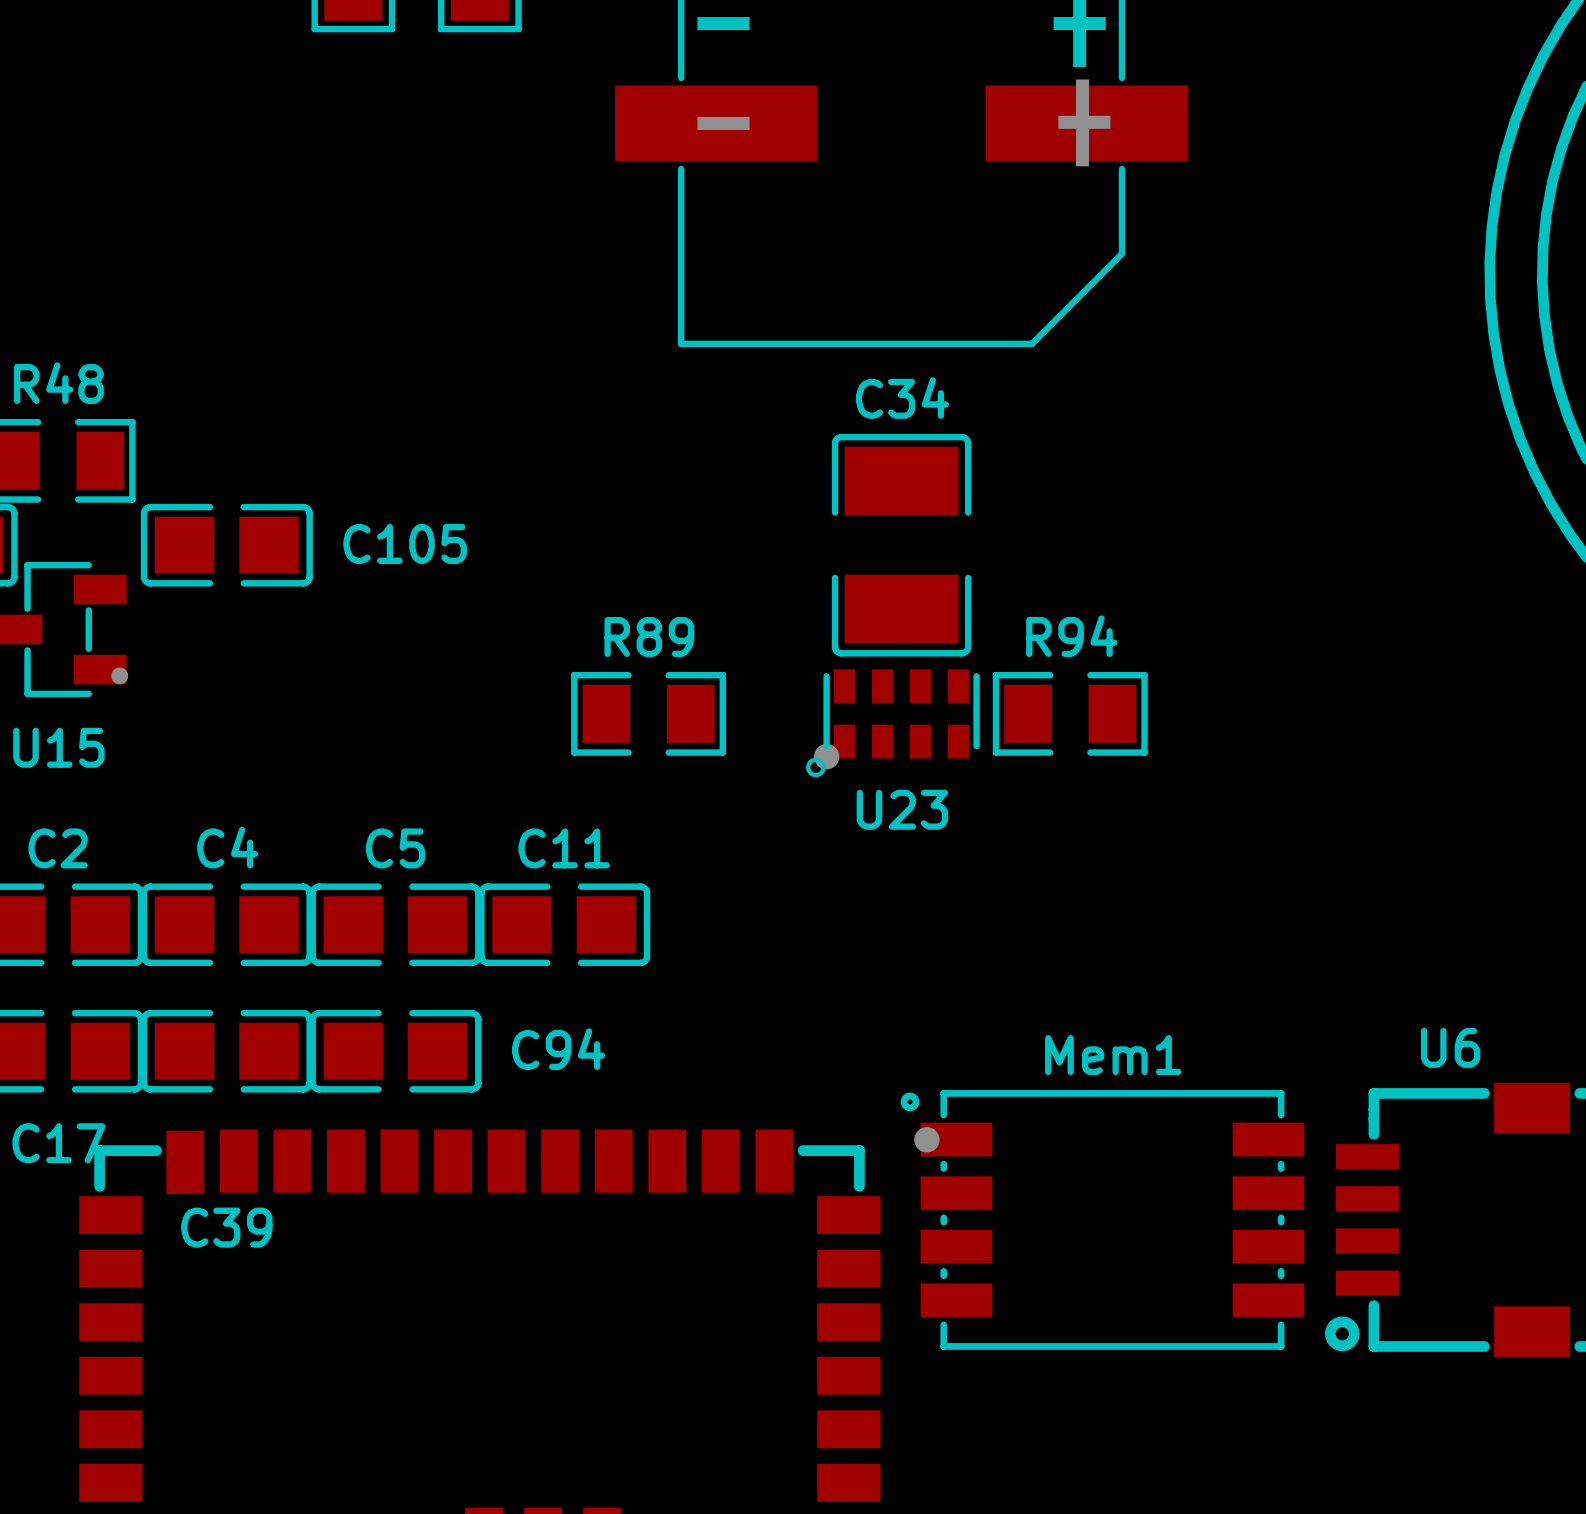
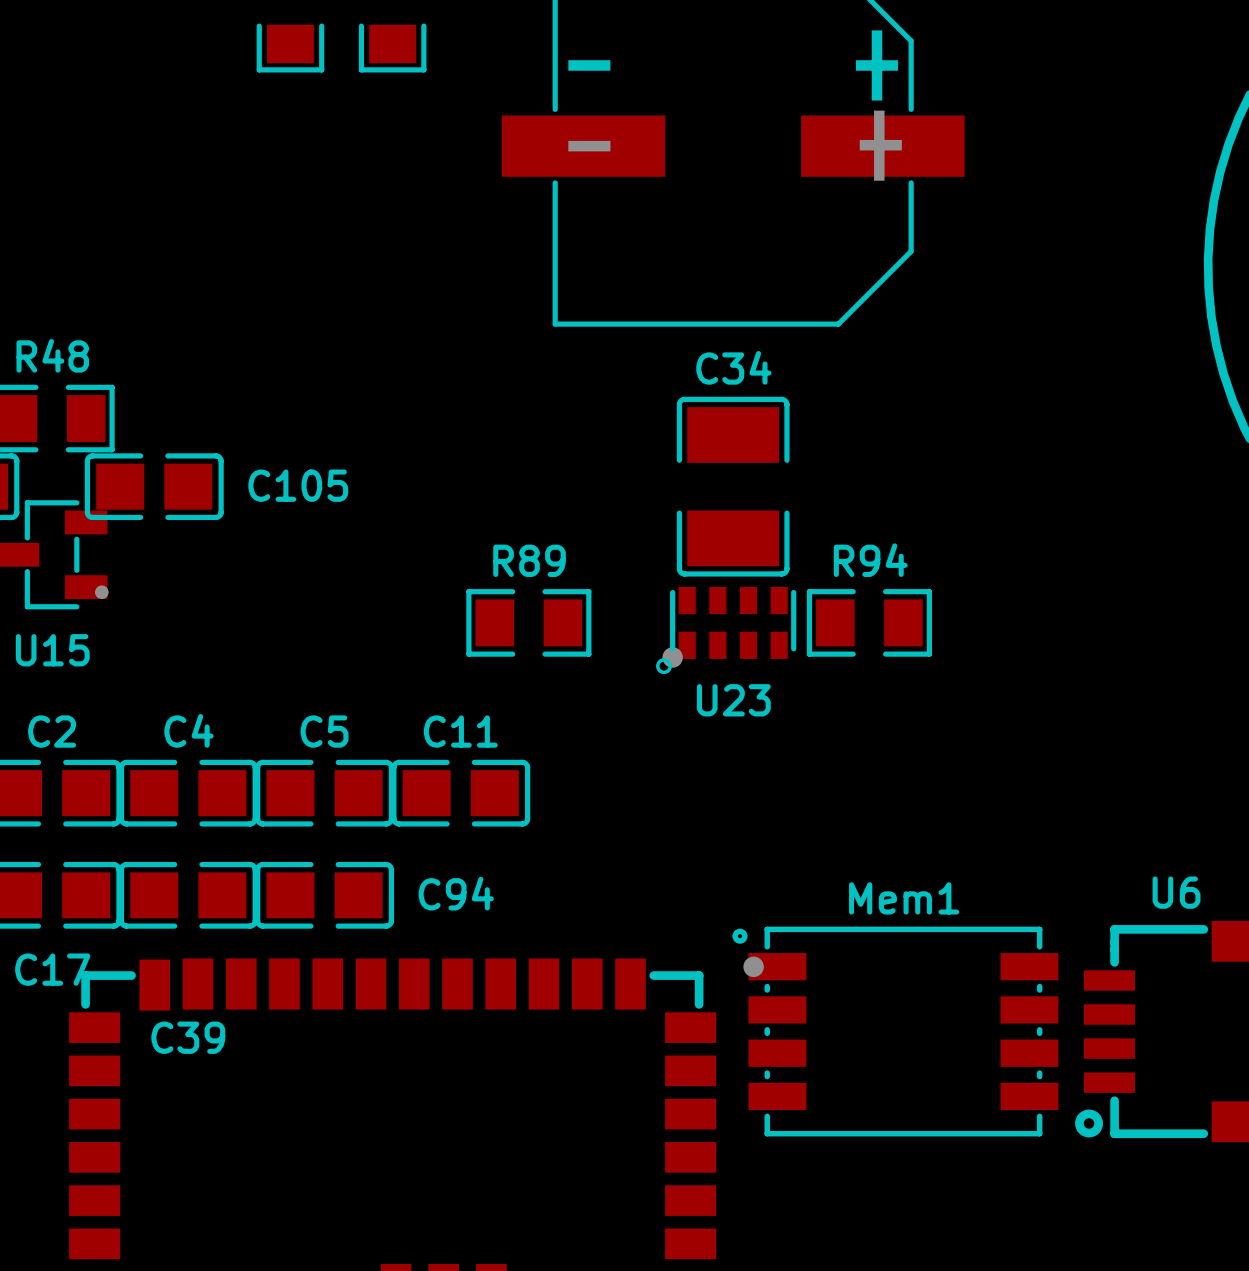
C105 position: (226, 545) -> (154, 486)

